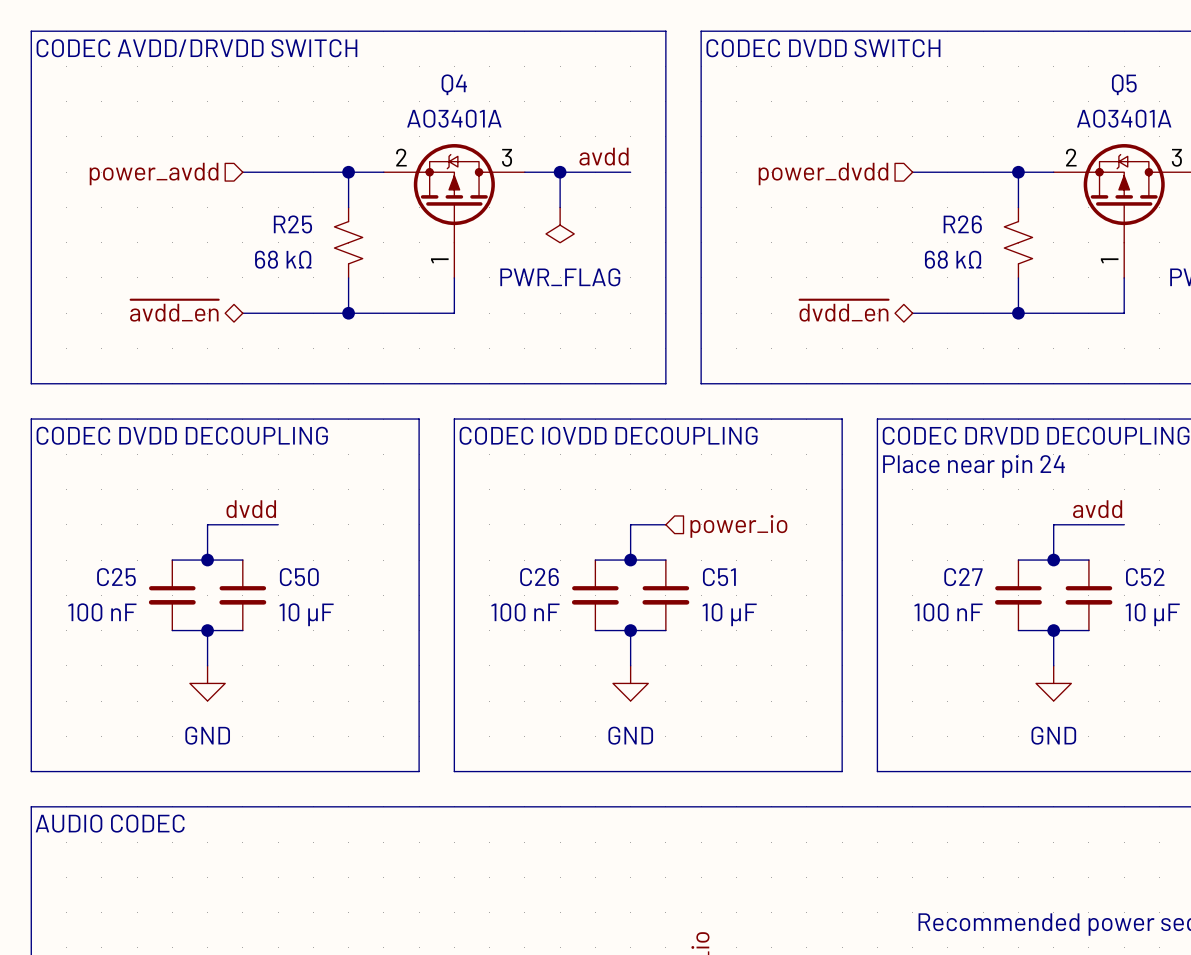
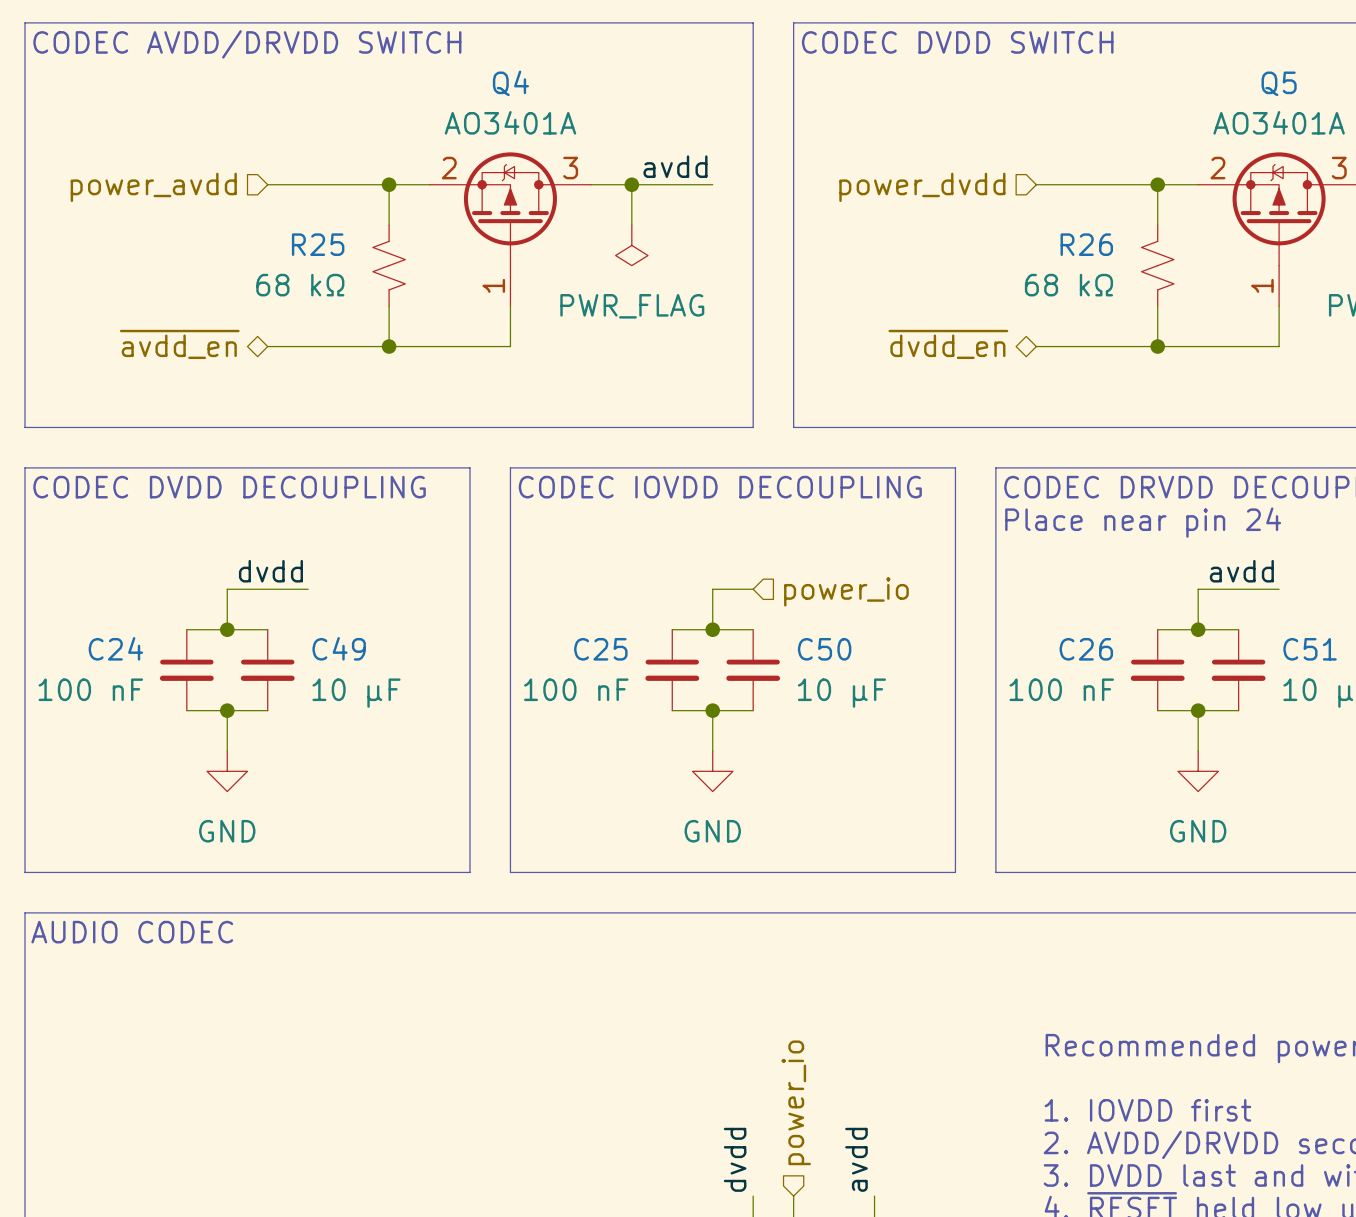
C25 name: C25 (116, 577) -> C24 (115, 648)
C50 name: C50 (299, 577) -> C49 (339, 648)
C26 name: C26 (539, 577) -> C25 (600, 649)
C51 name: C51 (719, 577) -> C50 (824, 649)
C27 name: C27 (963, 577) -> C26 (1086, 649)
C52 name: C52 (1145, 577) -> C51 (1310, 649)

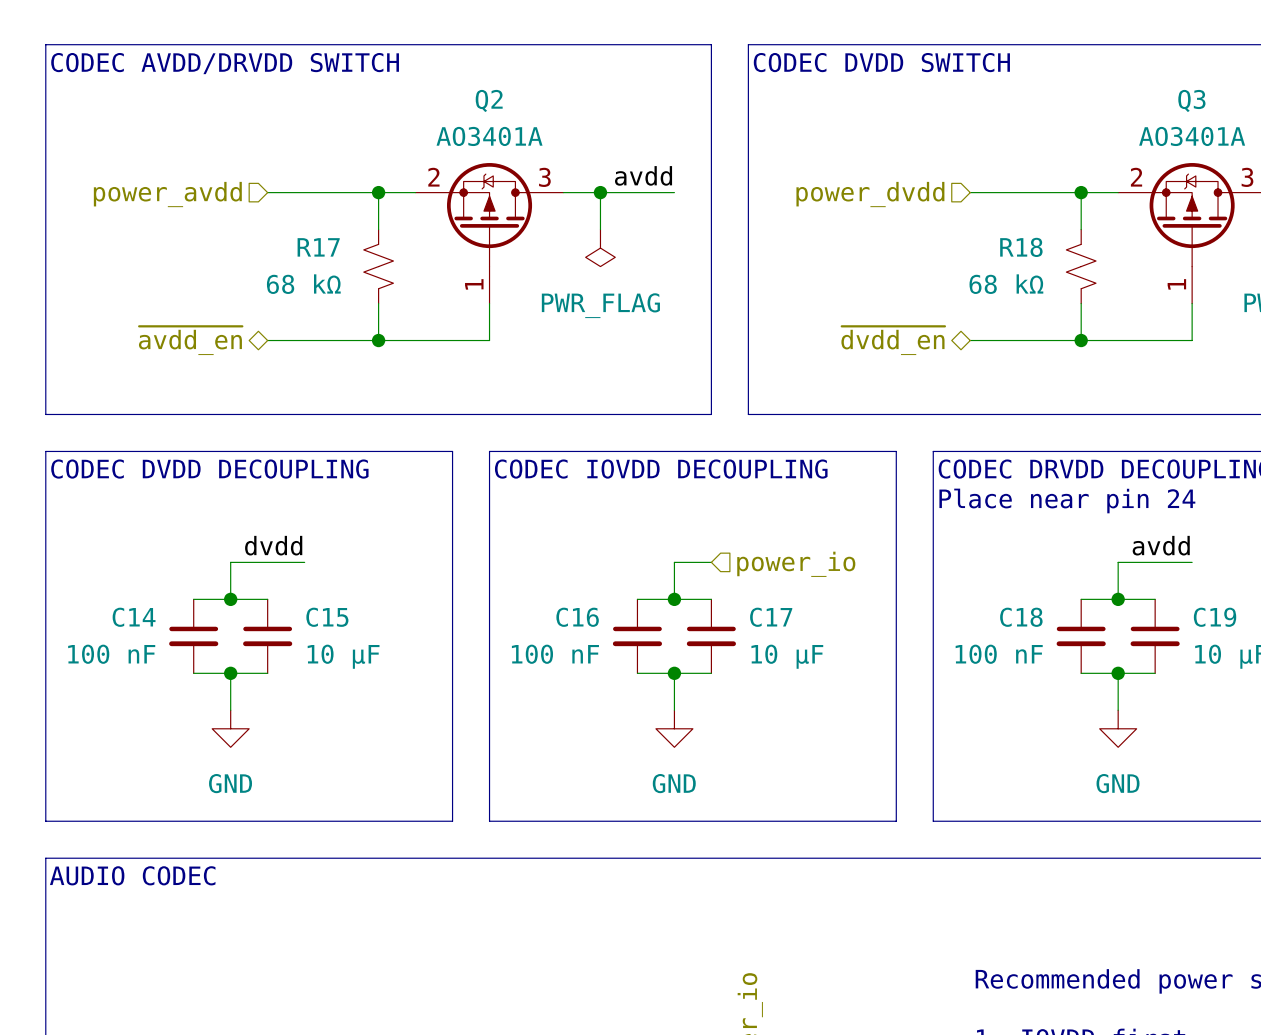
Q4 name: Q4 (510, 83) -> Q2 (489, 100)
Q5 name: Q5 (1279, 83) -> Q3 (1191, 100)
R25 name: R25 (318, 244) -> R17 (318, 247)
R26 name: R26 (1086, 244) -> R18 (1021, 247)
C24 name: C24 (115, 648) -> C14 (134, 617)
C49 name: C49 (339, 648) -> C15 (327, 617)
C25 name: C25 (600, 649) -> C16 (577, 617)
C50 name: C50 (824, 649) -> C17 (771, 617)
C26 name: C26 (1086, 649) -> C18 (1021, 617)
C51 name: C51 (1310, 649) -> C19 (1215, 617)

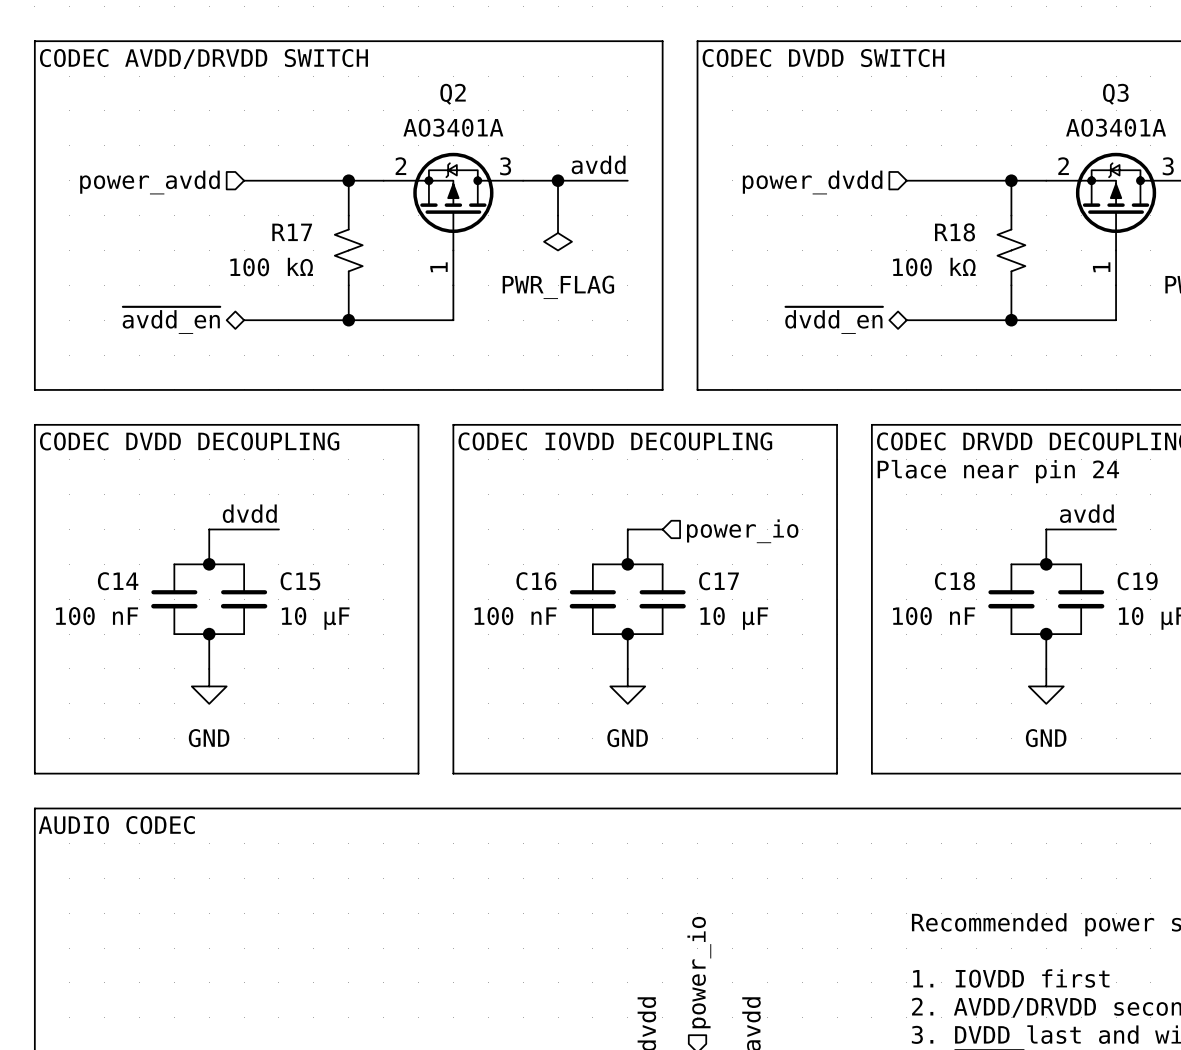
R17 value: 68 kΩ (303, 284) -> 100 kΩ (271, 267)
R18 value: 68 kΩ (1006, 284) -> 100 kΩ (934, 267)

